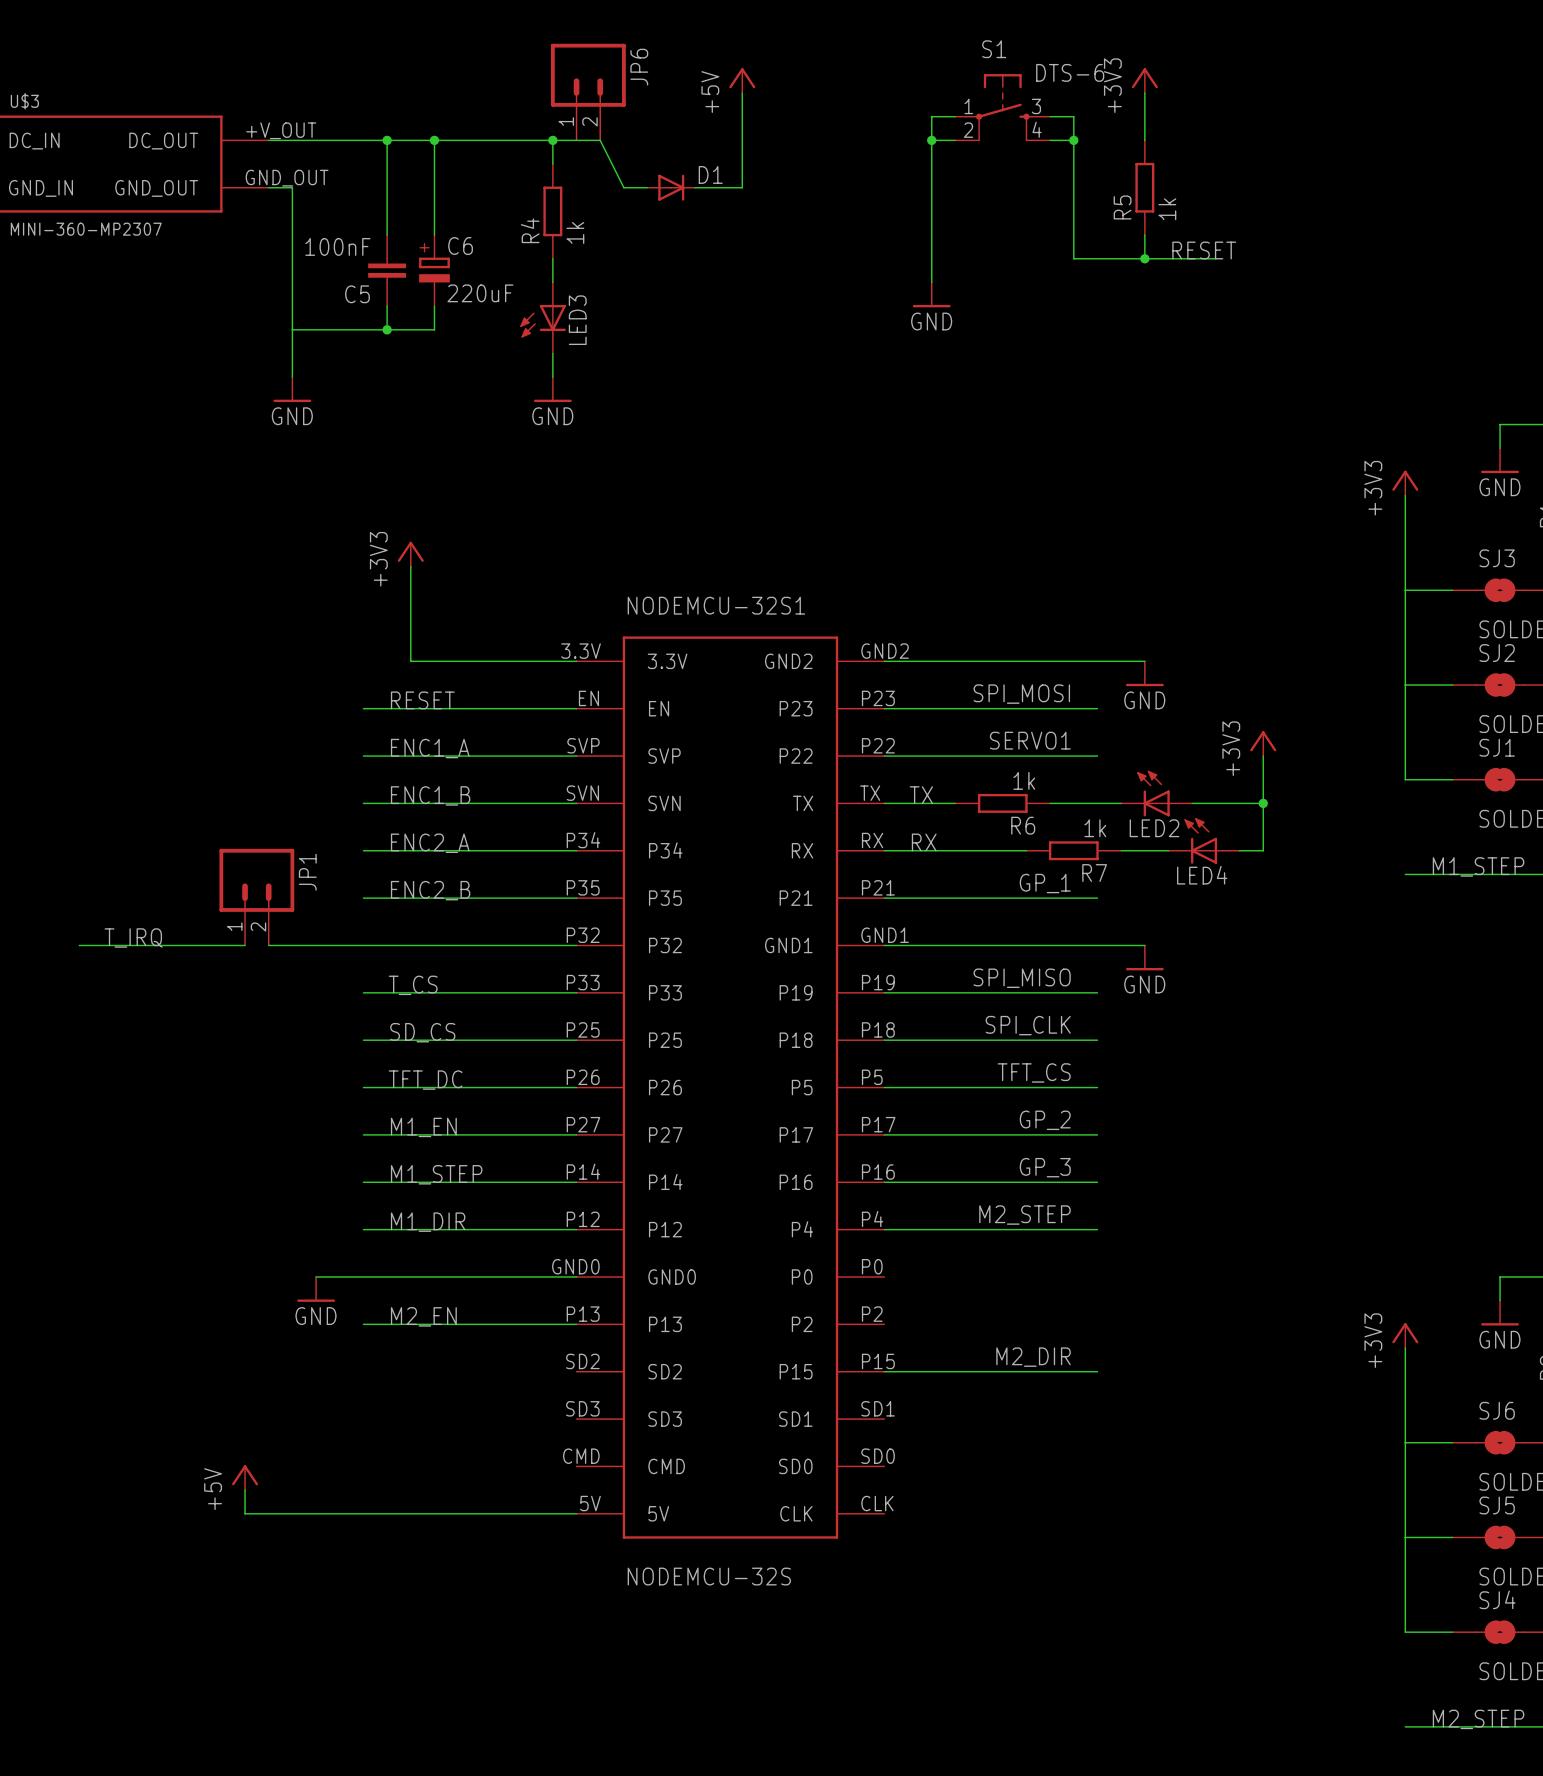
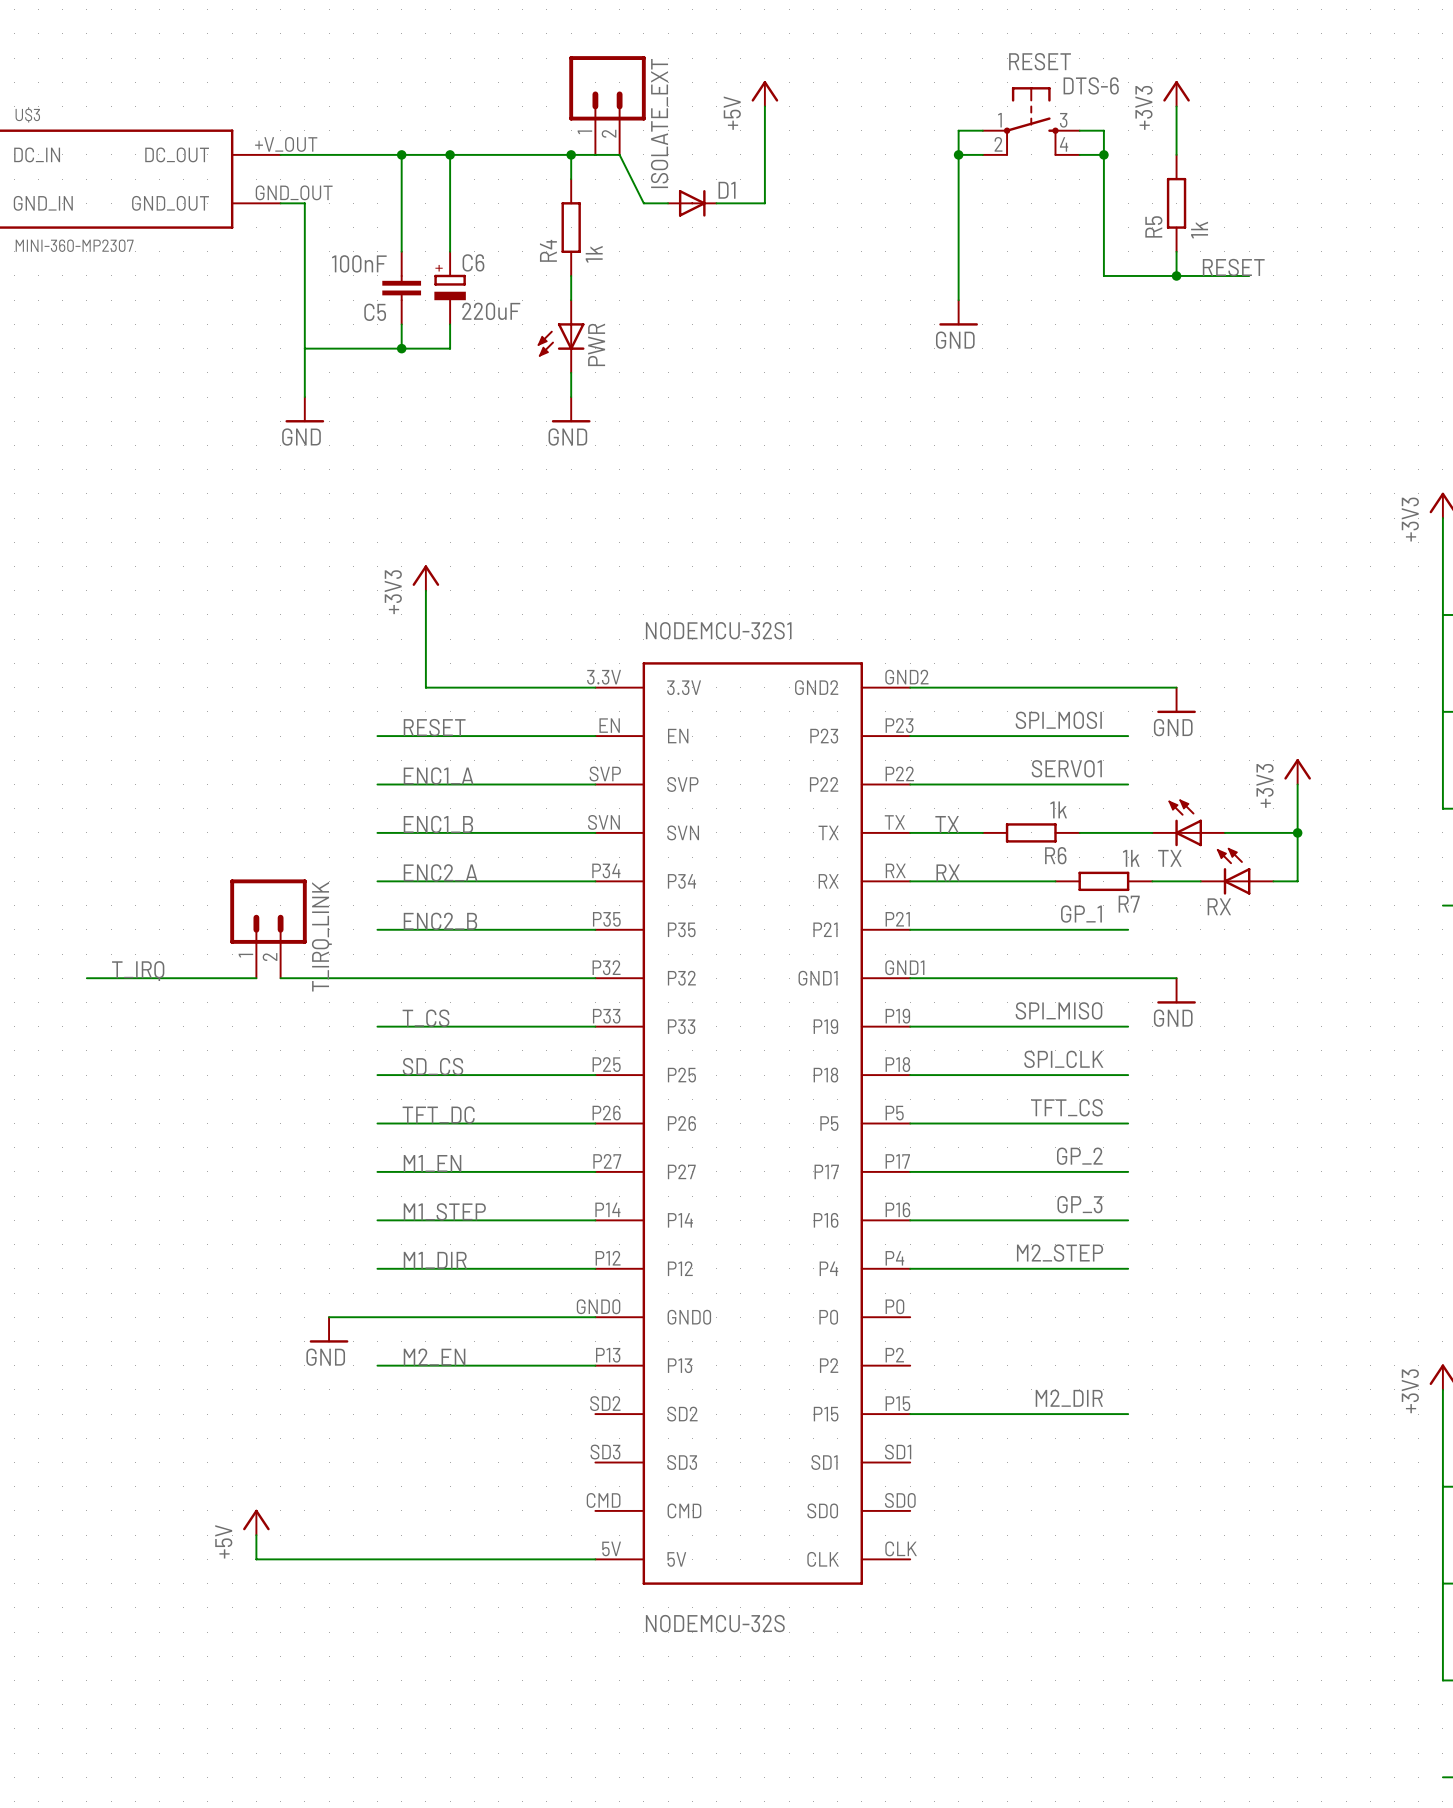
S1 name: S1 (994, 49) -> RESET (1040, 61)
JP6 name: JP6 (639, 67) -> ISOLATE_EXT (659, 123)
LED3 name: LED3 (577, 320) -> PWR (596, 344)
LED2 name: LED2 (1154, 828) -> TX (1169, 858)
JP1 name: JP1 (307, 872) -> T_IRQ_LINK (321, 936)
LED4 name: LED4 (1202, 875) -> RX (1219, 906)

